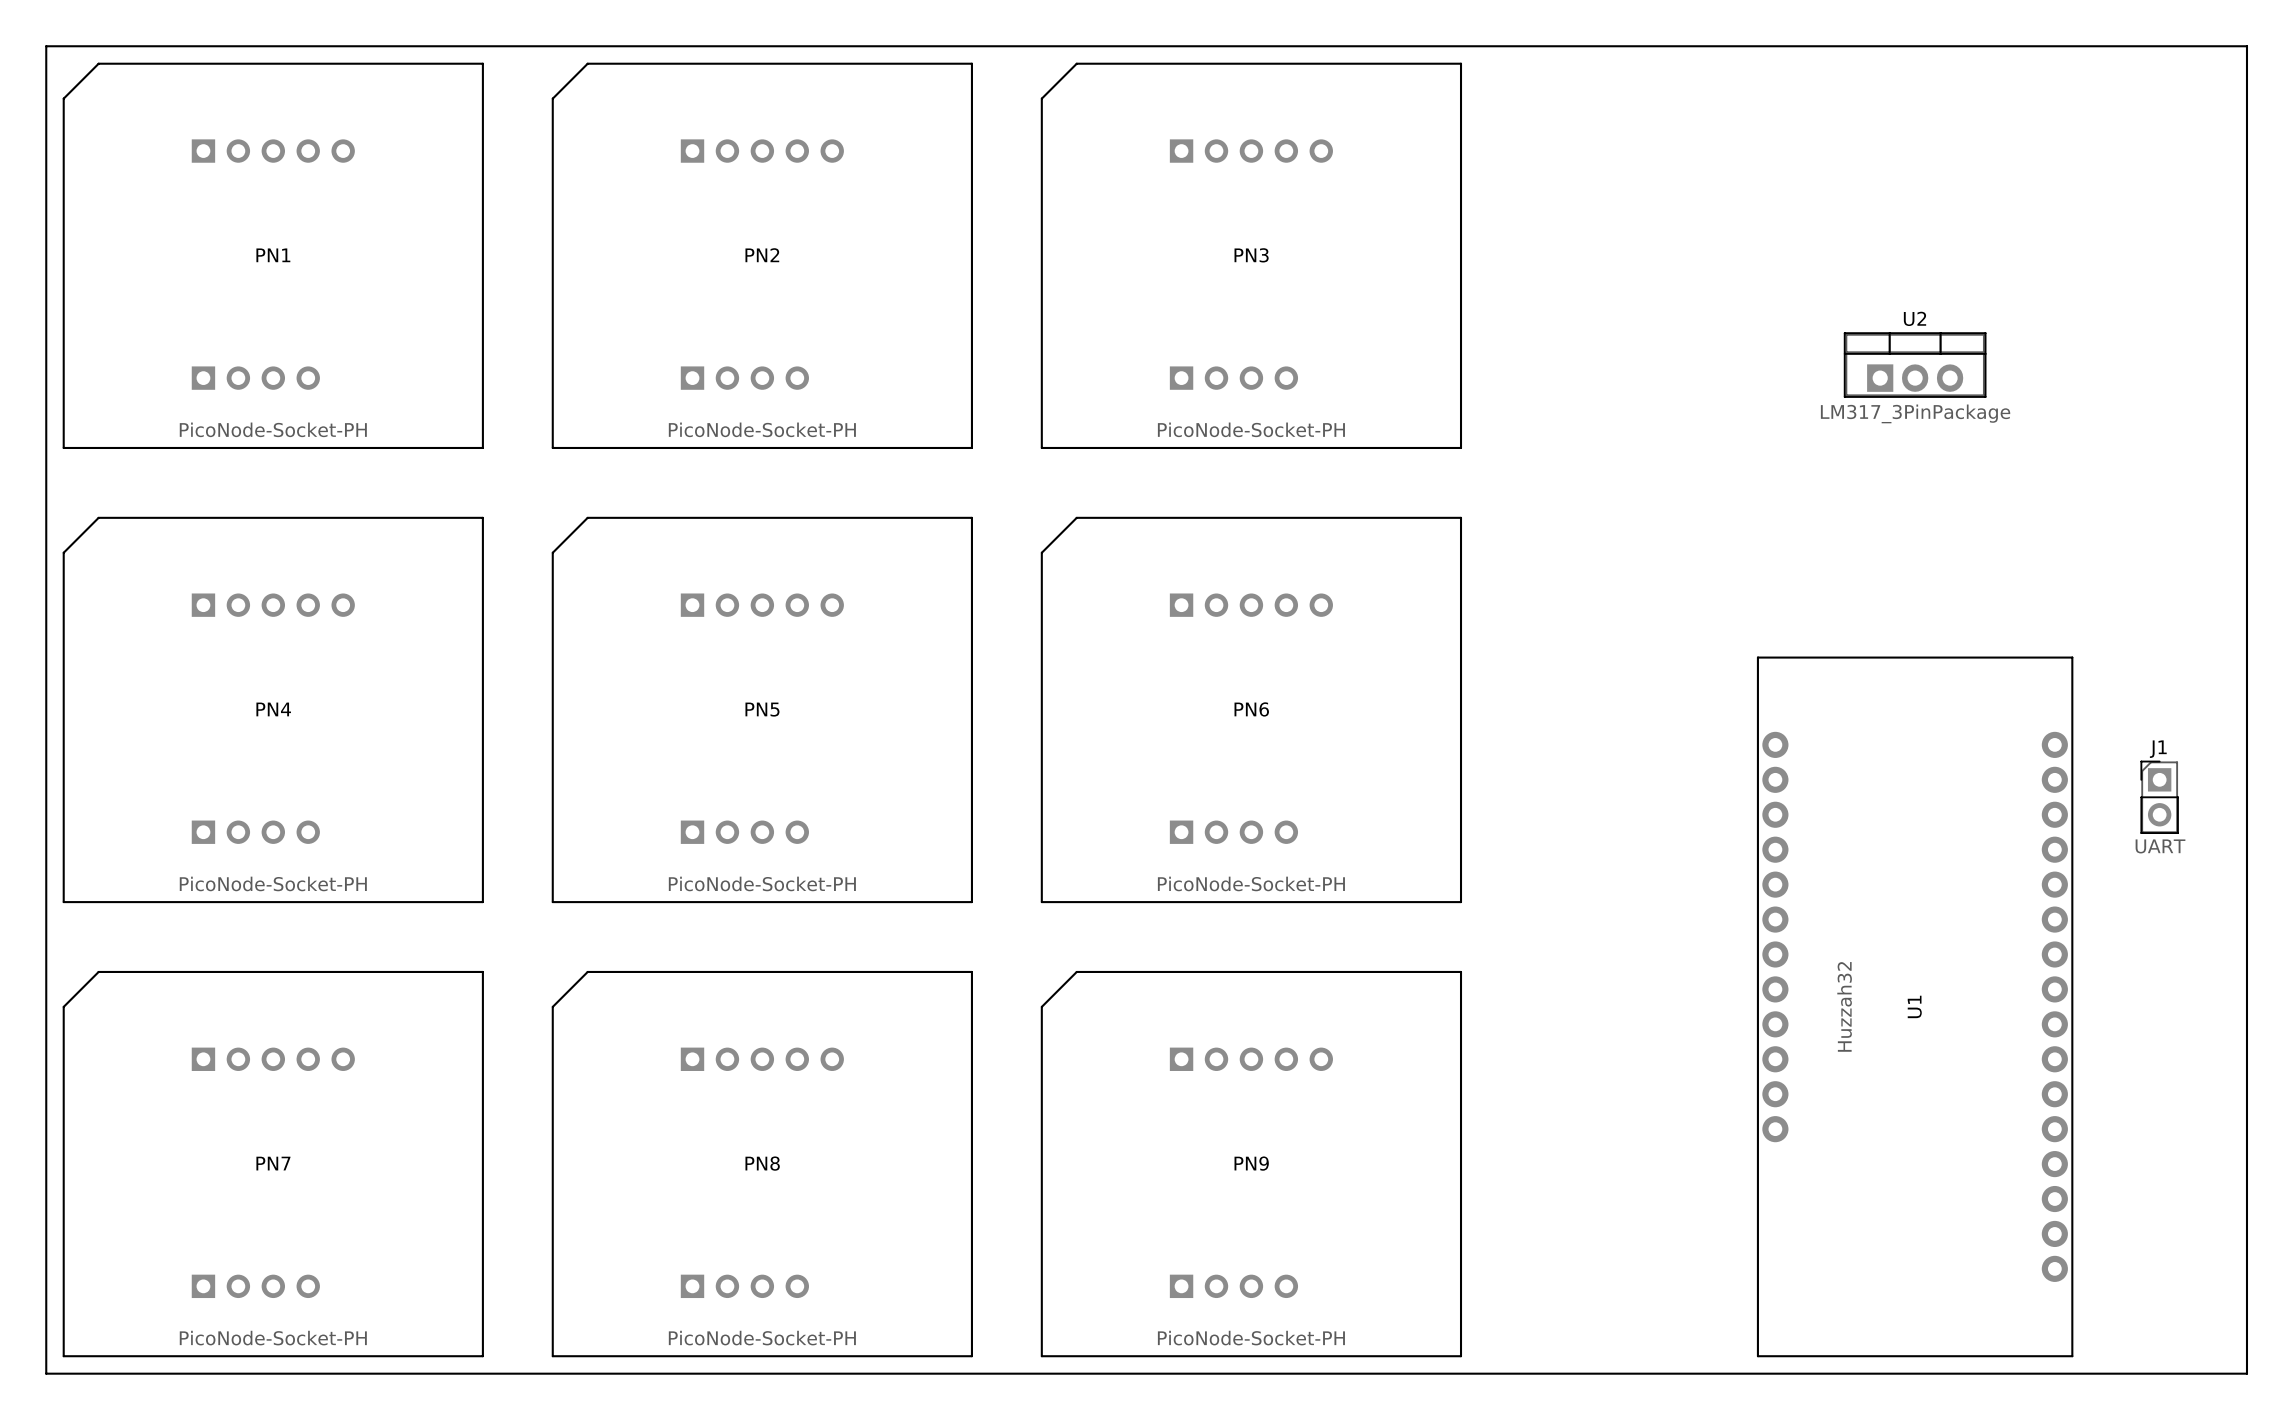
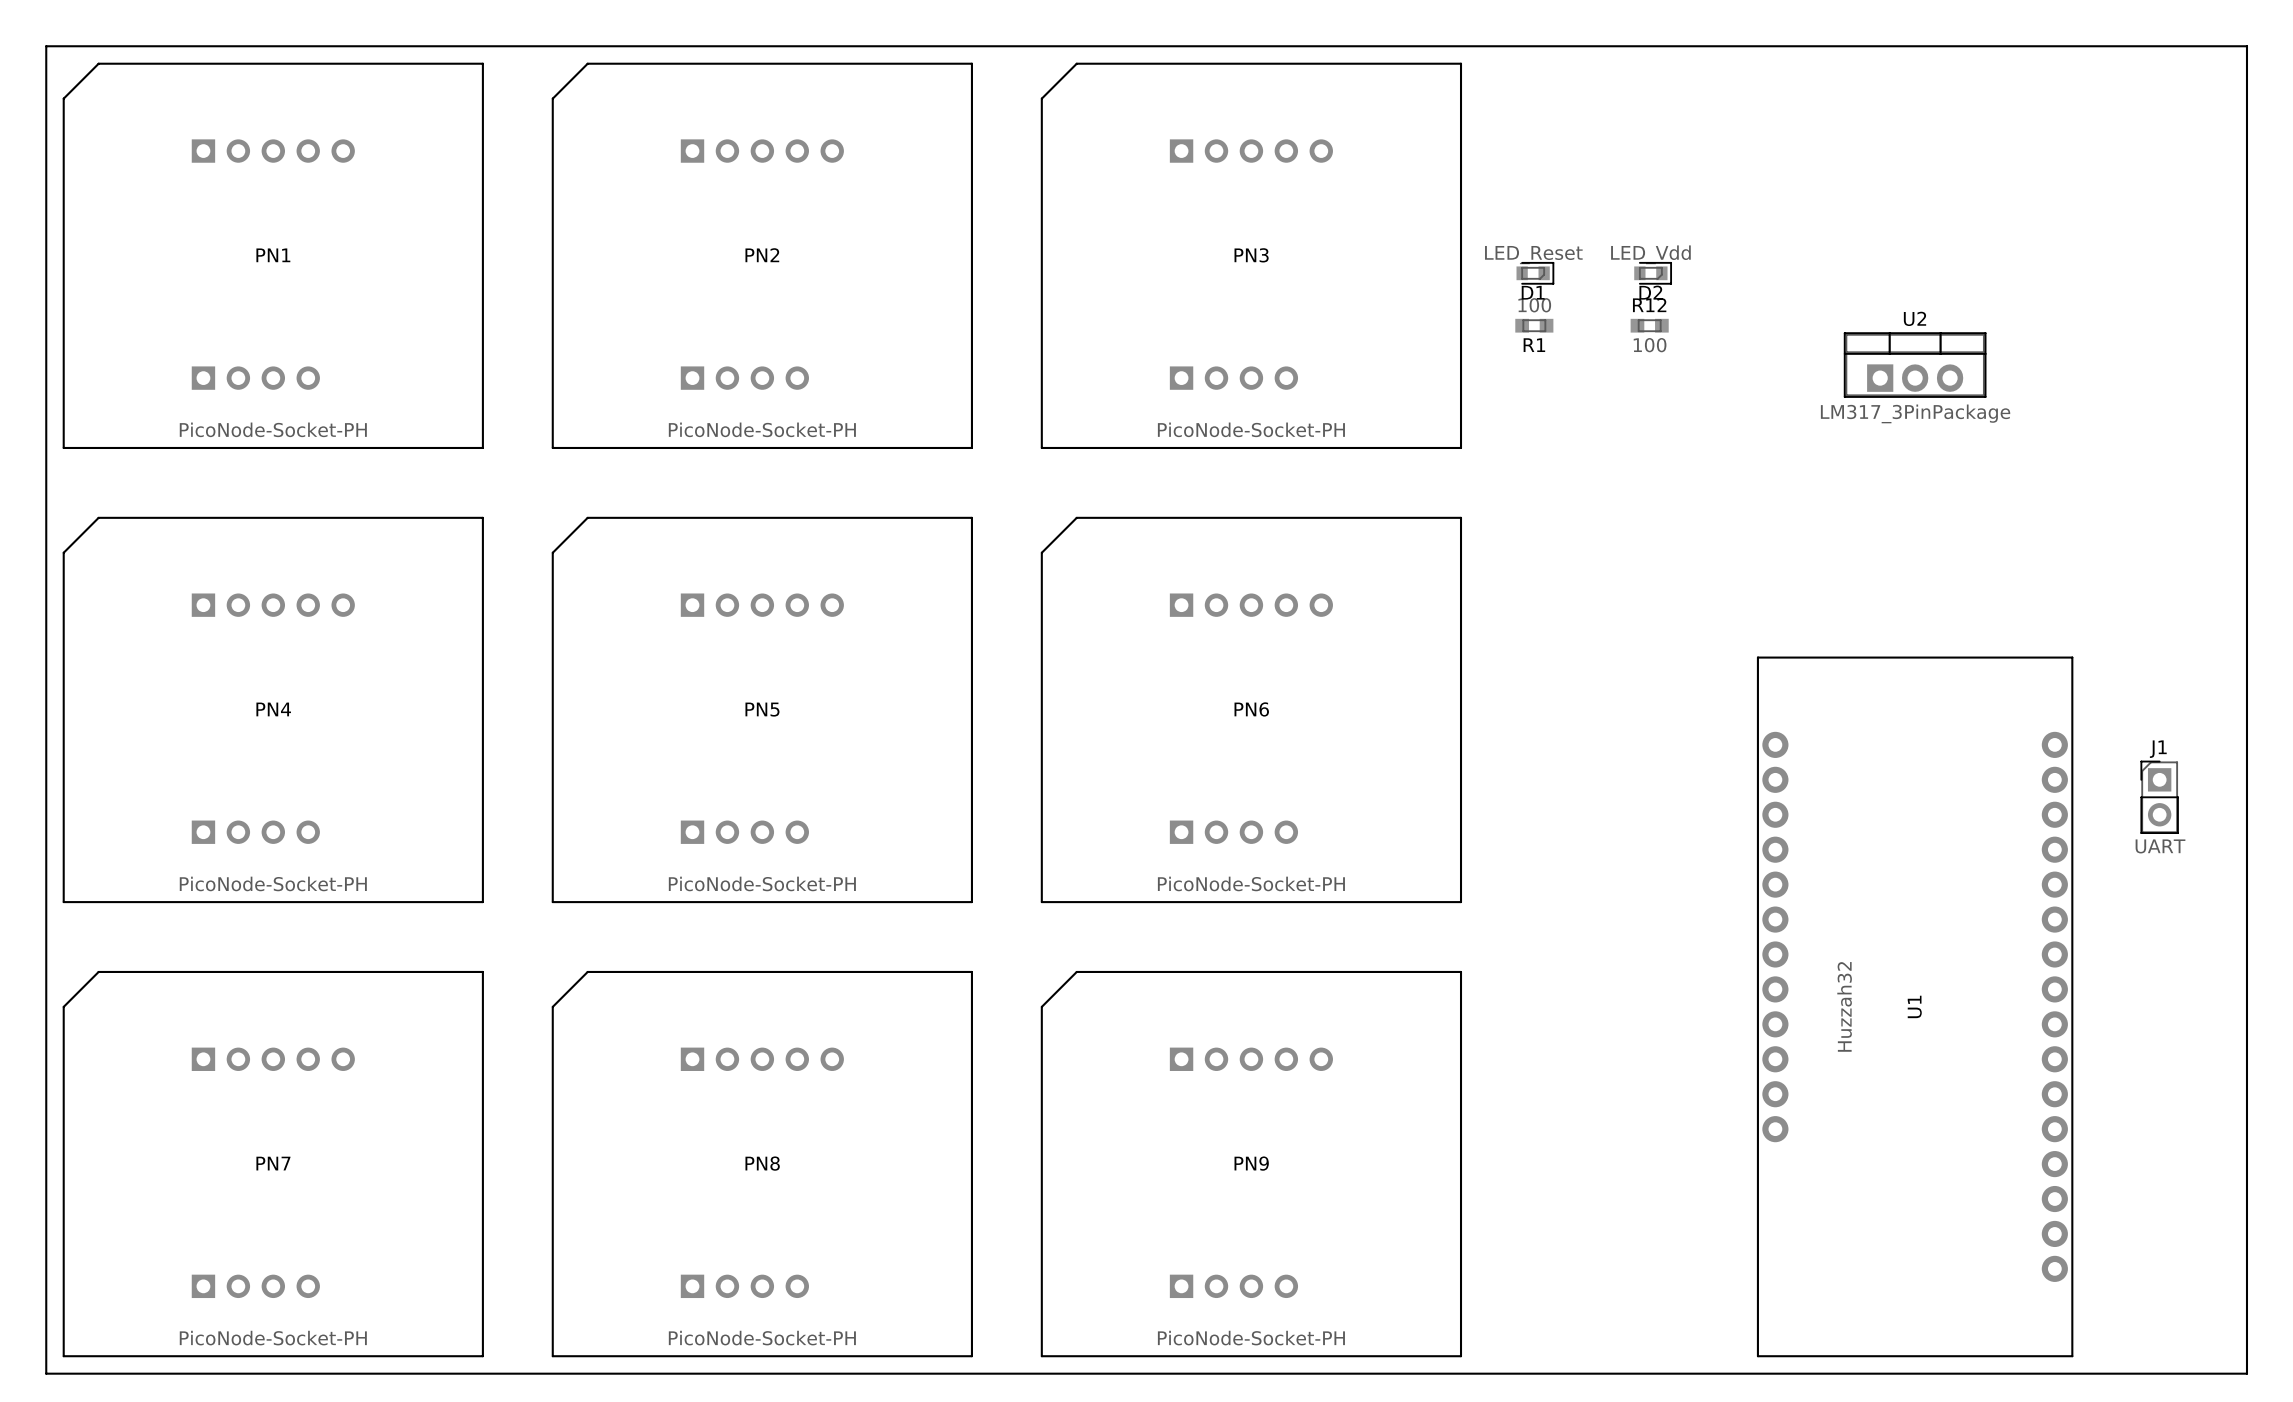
D1: none -> LED_Reset (1535, 273)
D2: none -> LED_Vdd (1653, 273)
R1: none -> 100 (1534, 325)
R12: none -> 100 (1649, 325)

